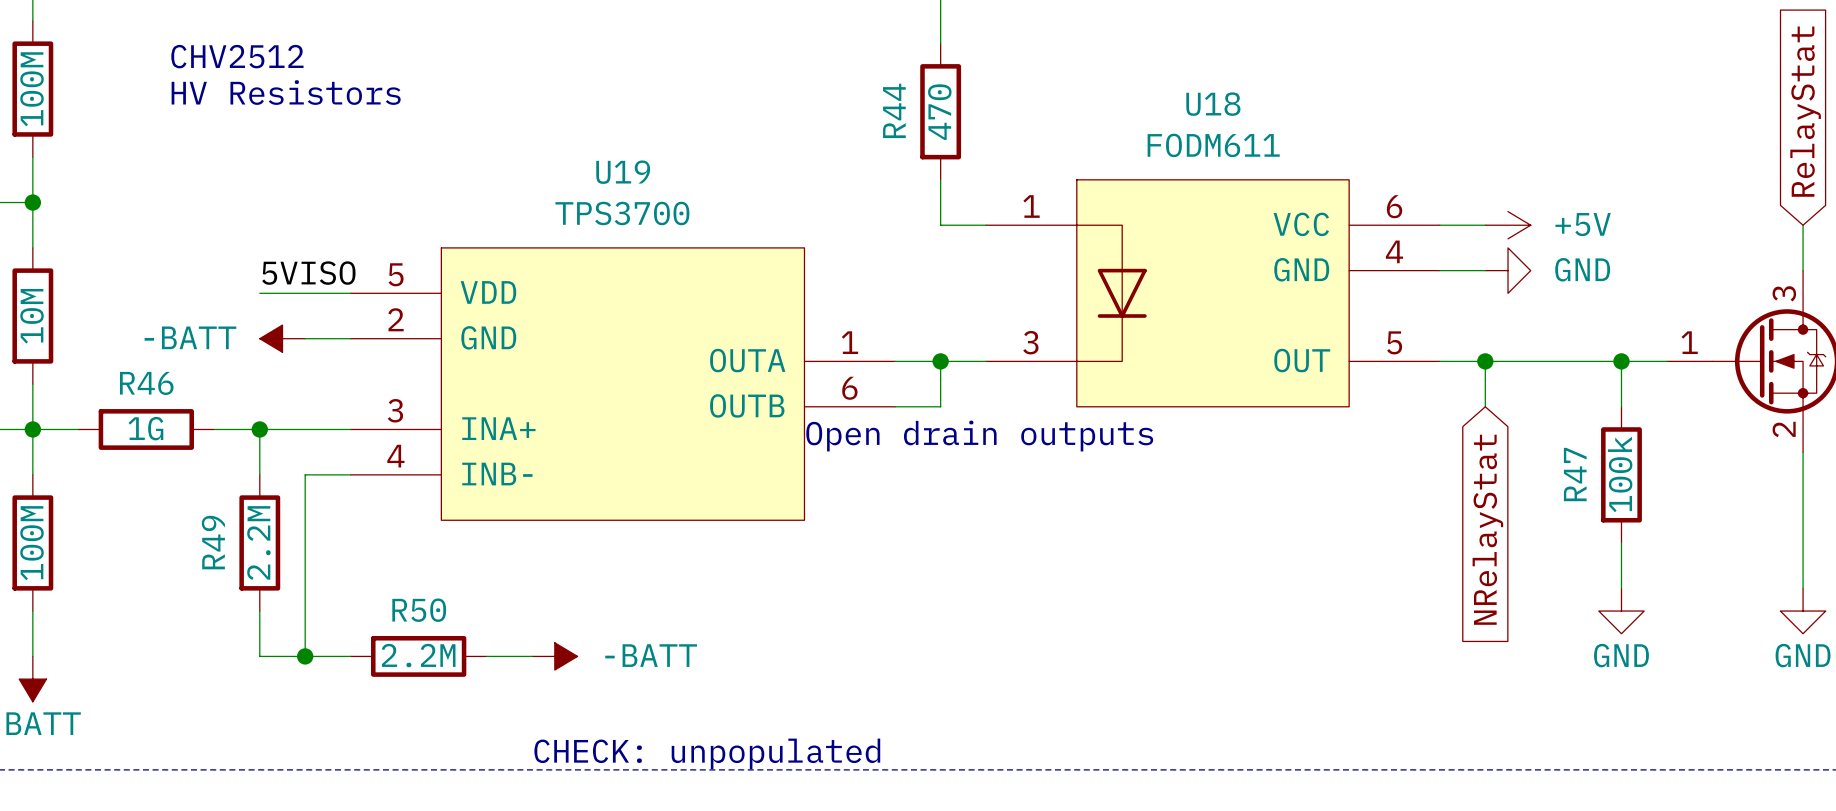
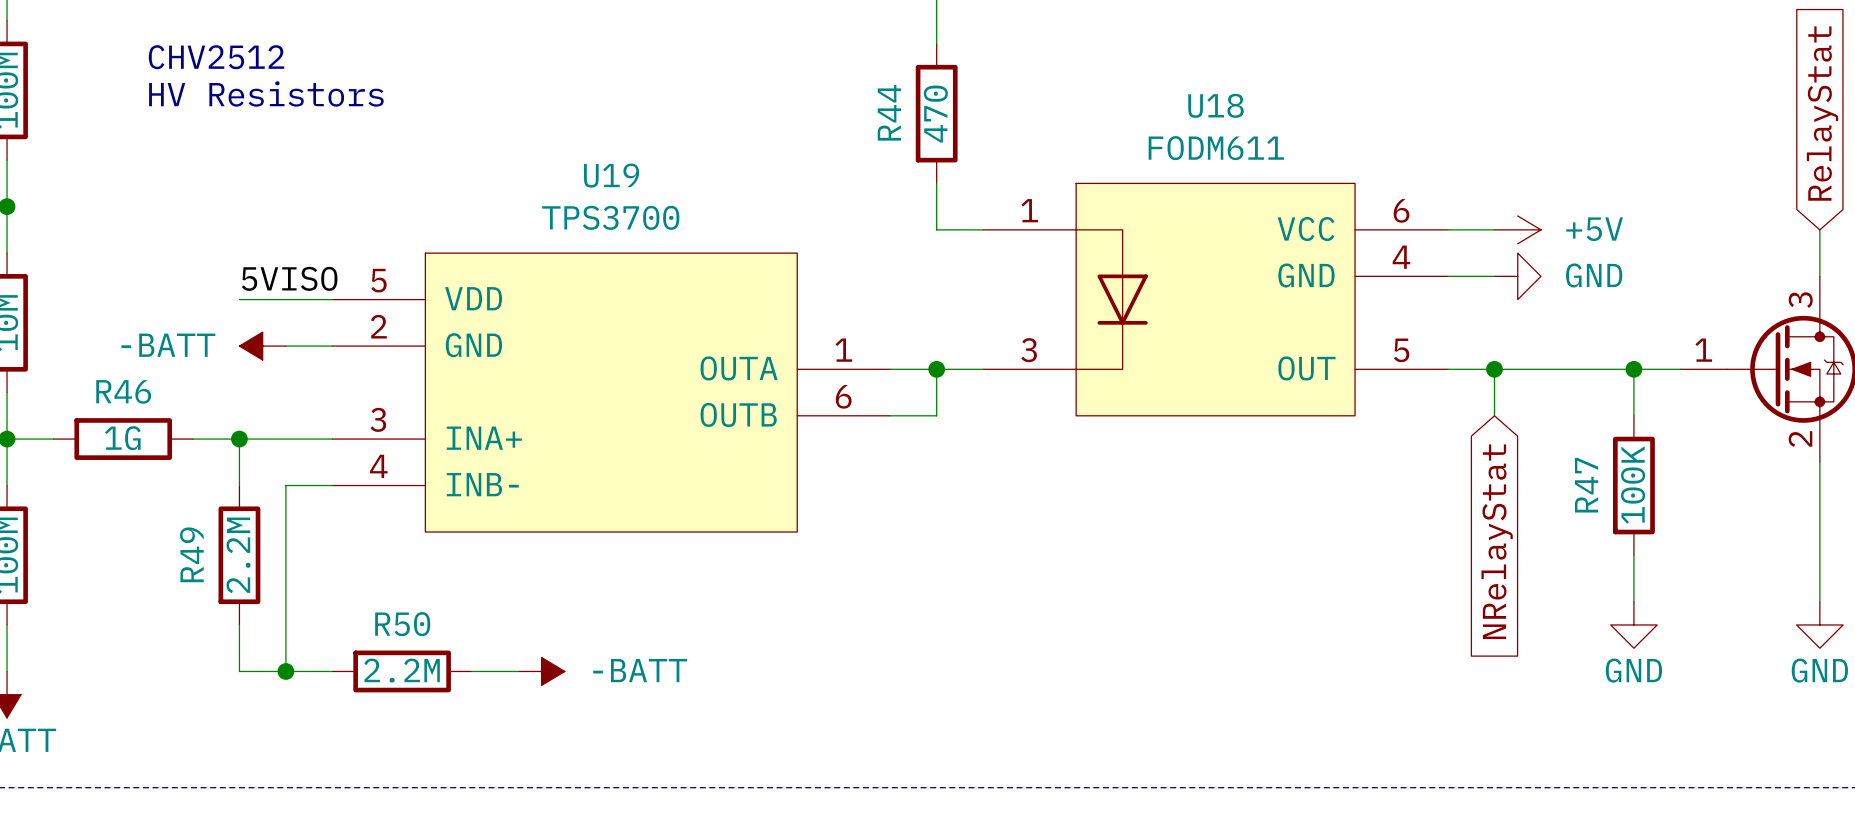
text: Open drain outputs (979, 436) -> none
R47 value: 100k (1620, 474) -> 100K (1633, 485)
text: CHECK: unpopulated (707, 753) -> none

